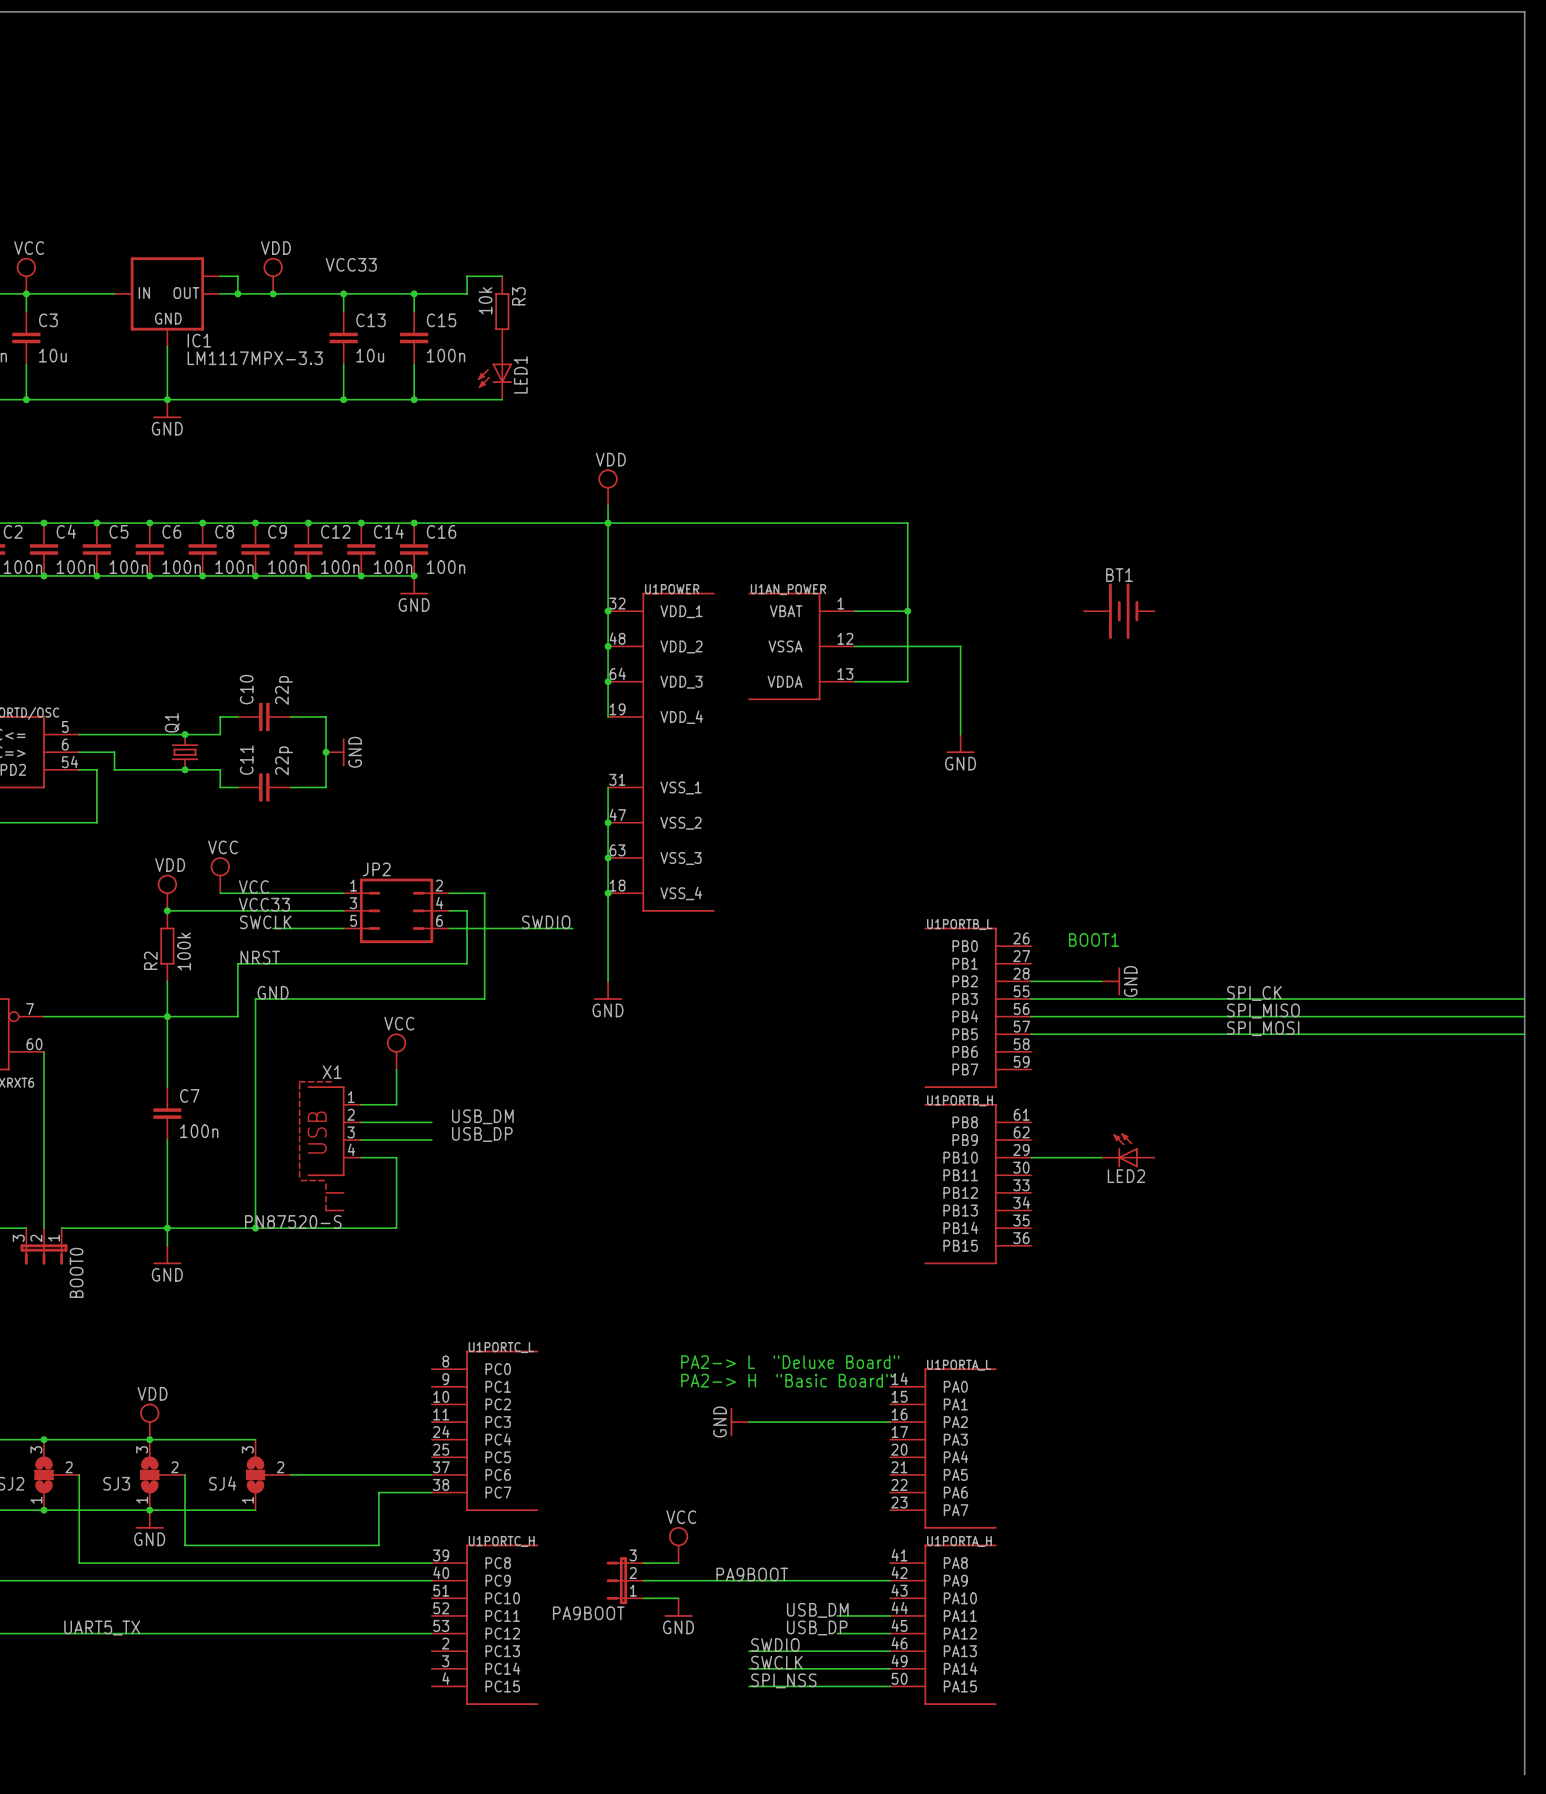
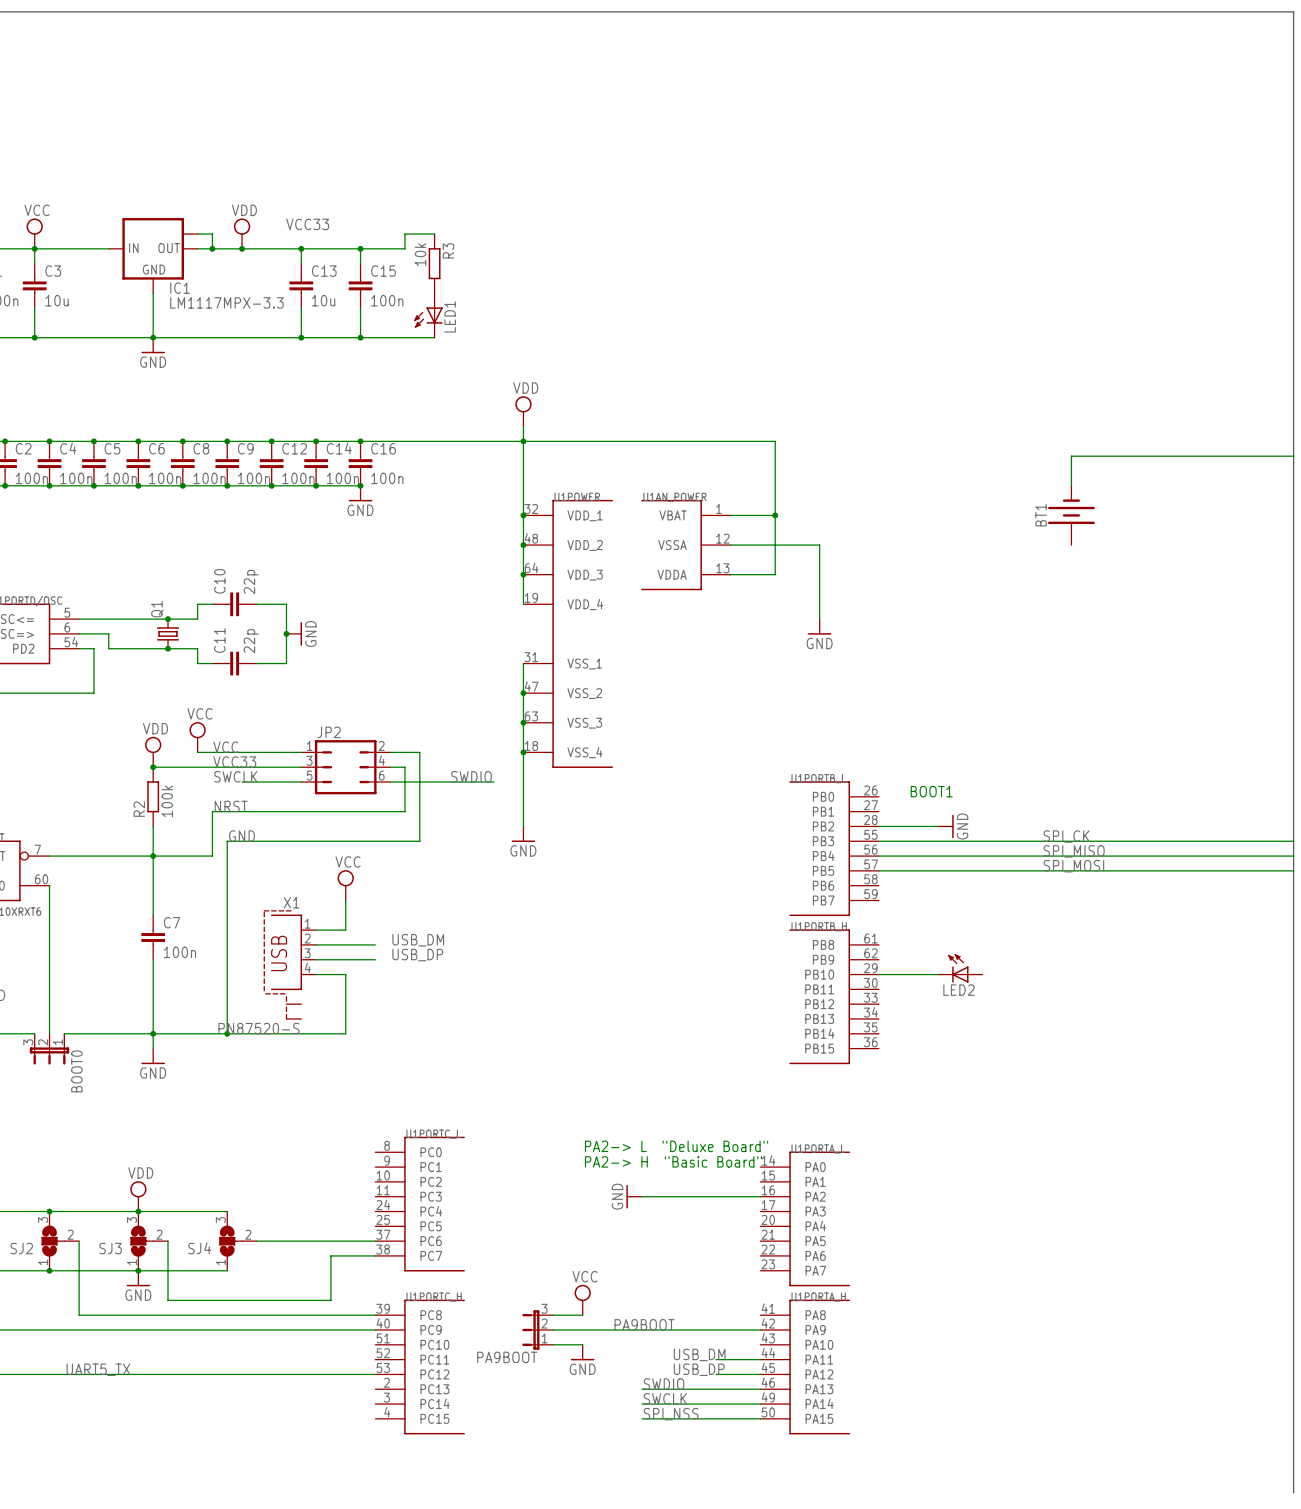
wire: none -> (1293, 456) (1071, 456) (1071, 485)
BT1 rotation: 0° (1119, 611) -> 90° counterclockwise (1071, 515)
BT1 position: (1119, 611) -> (1071, 515)

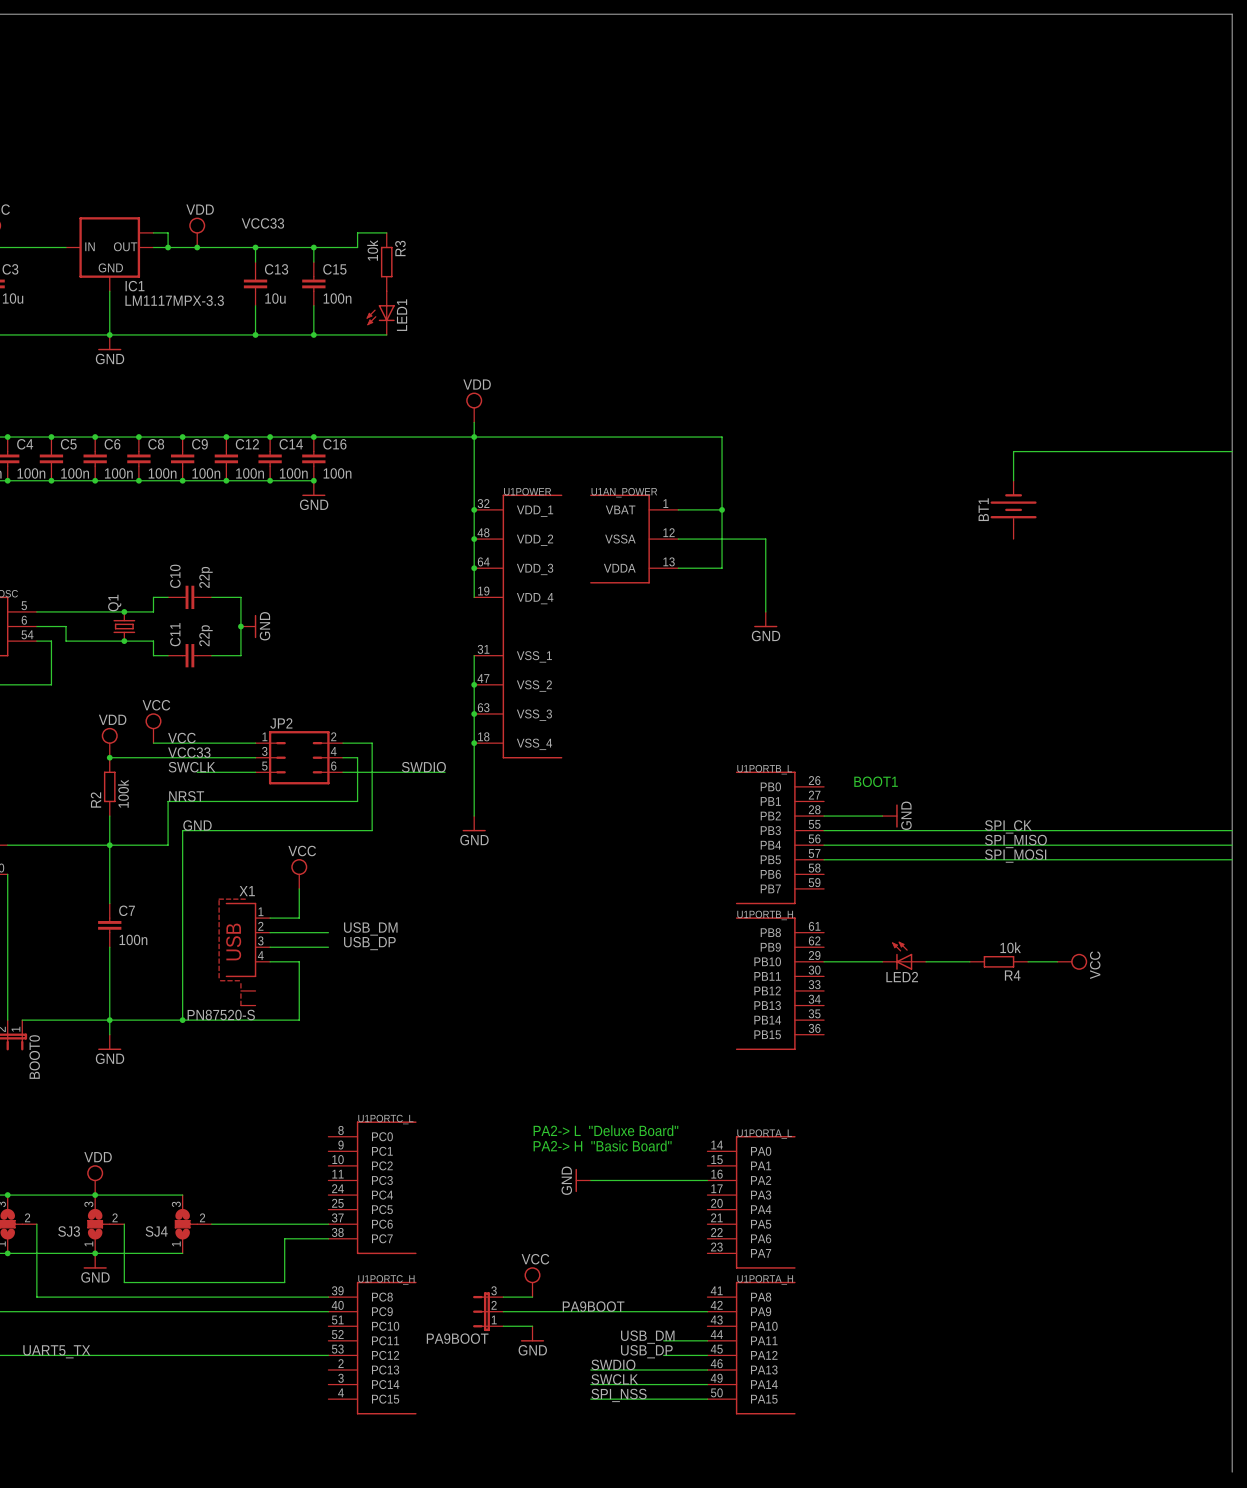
wire: none -> (926, 961) (969, 961)
R4: none -> 10k (999, 961)
wire: none -> (1028, 961) (1057, 961)
power symbol: none -> VCC (1072, 961)

